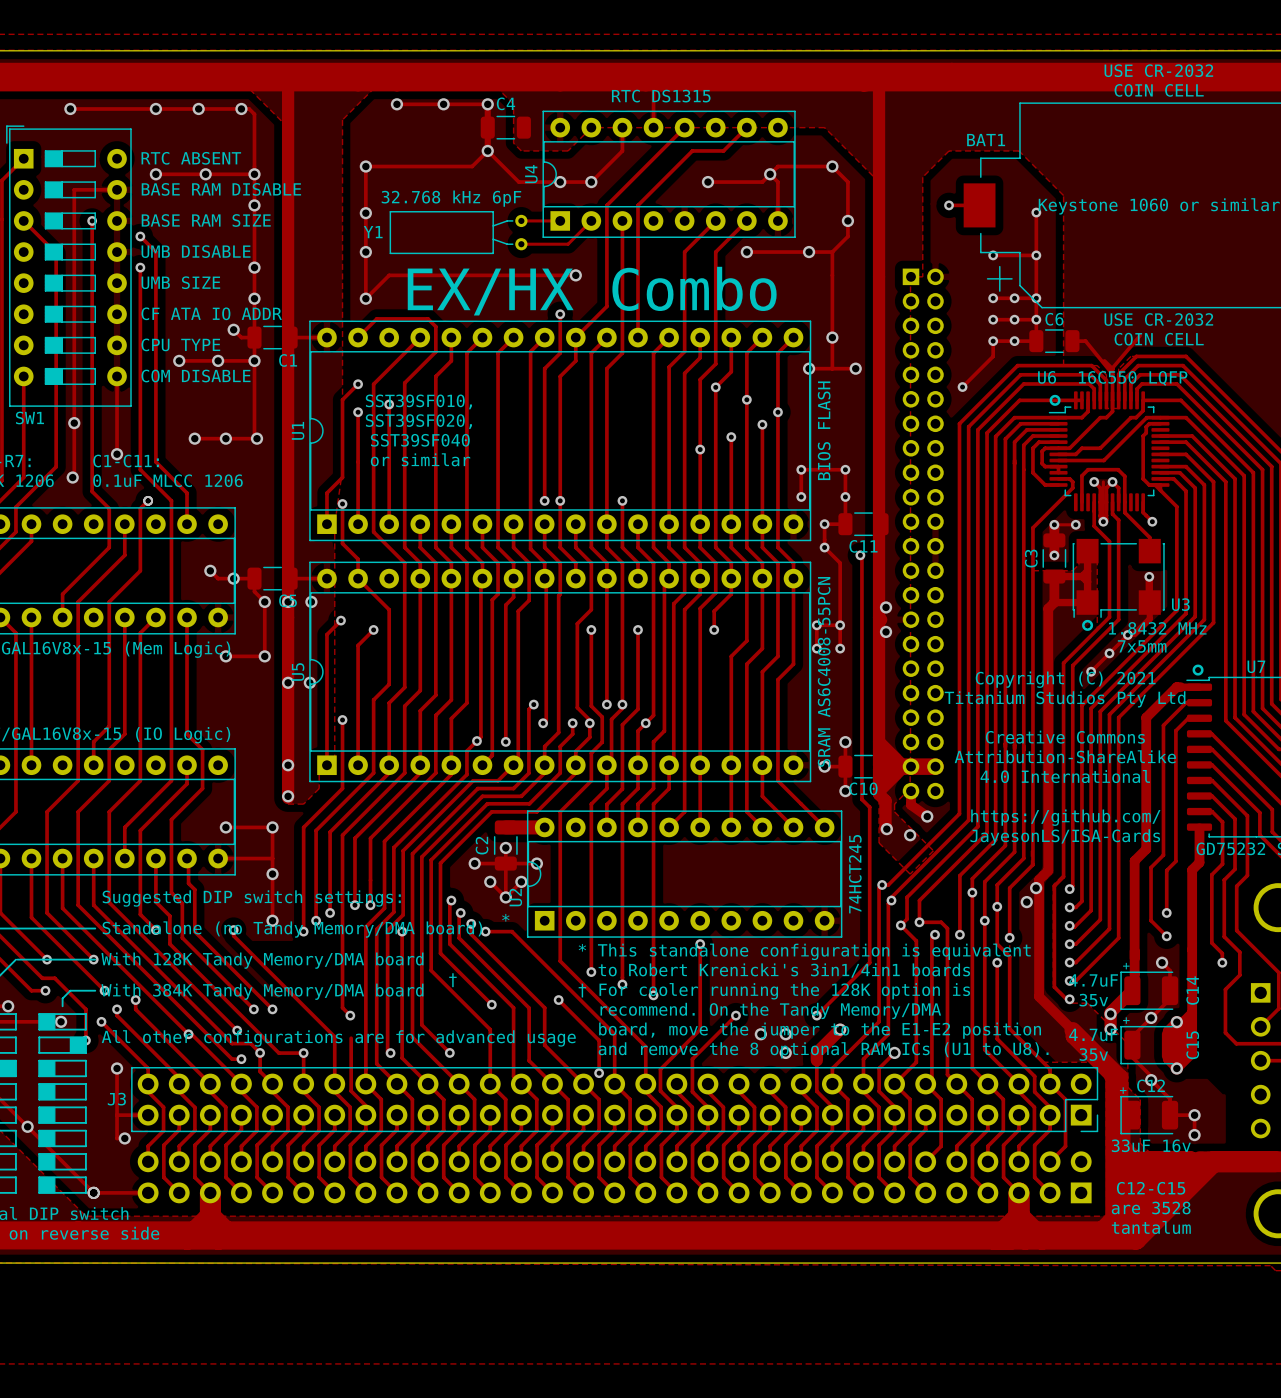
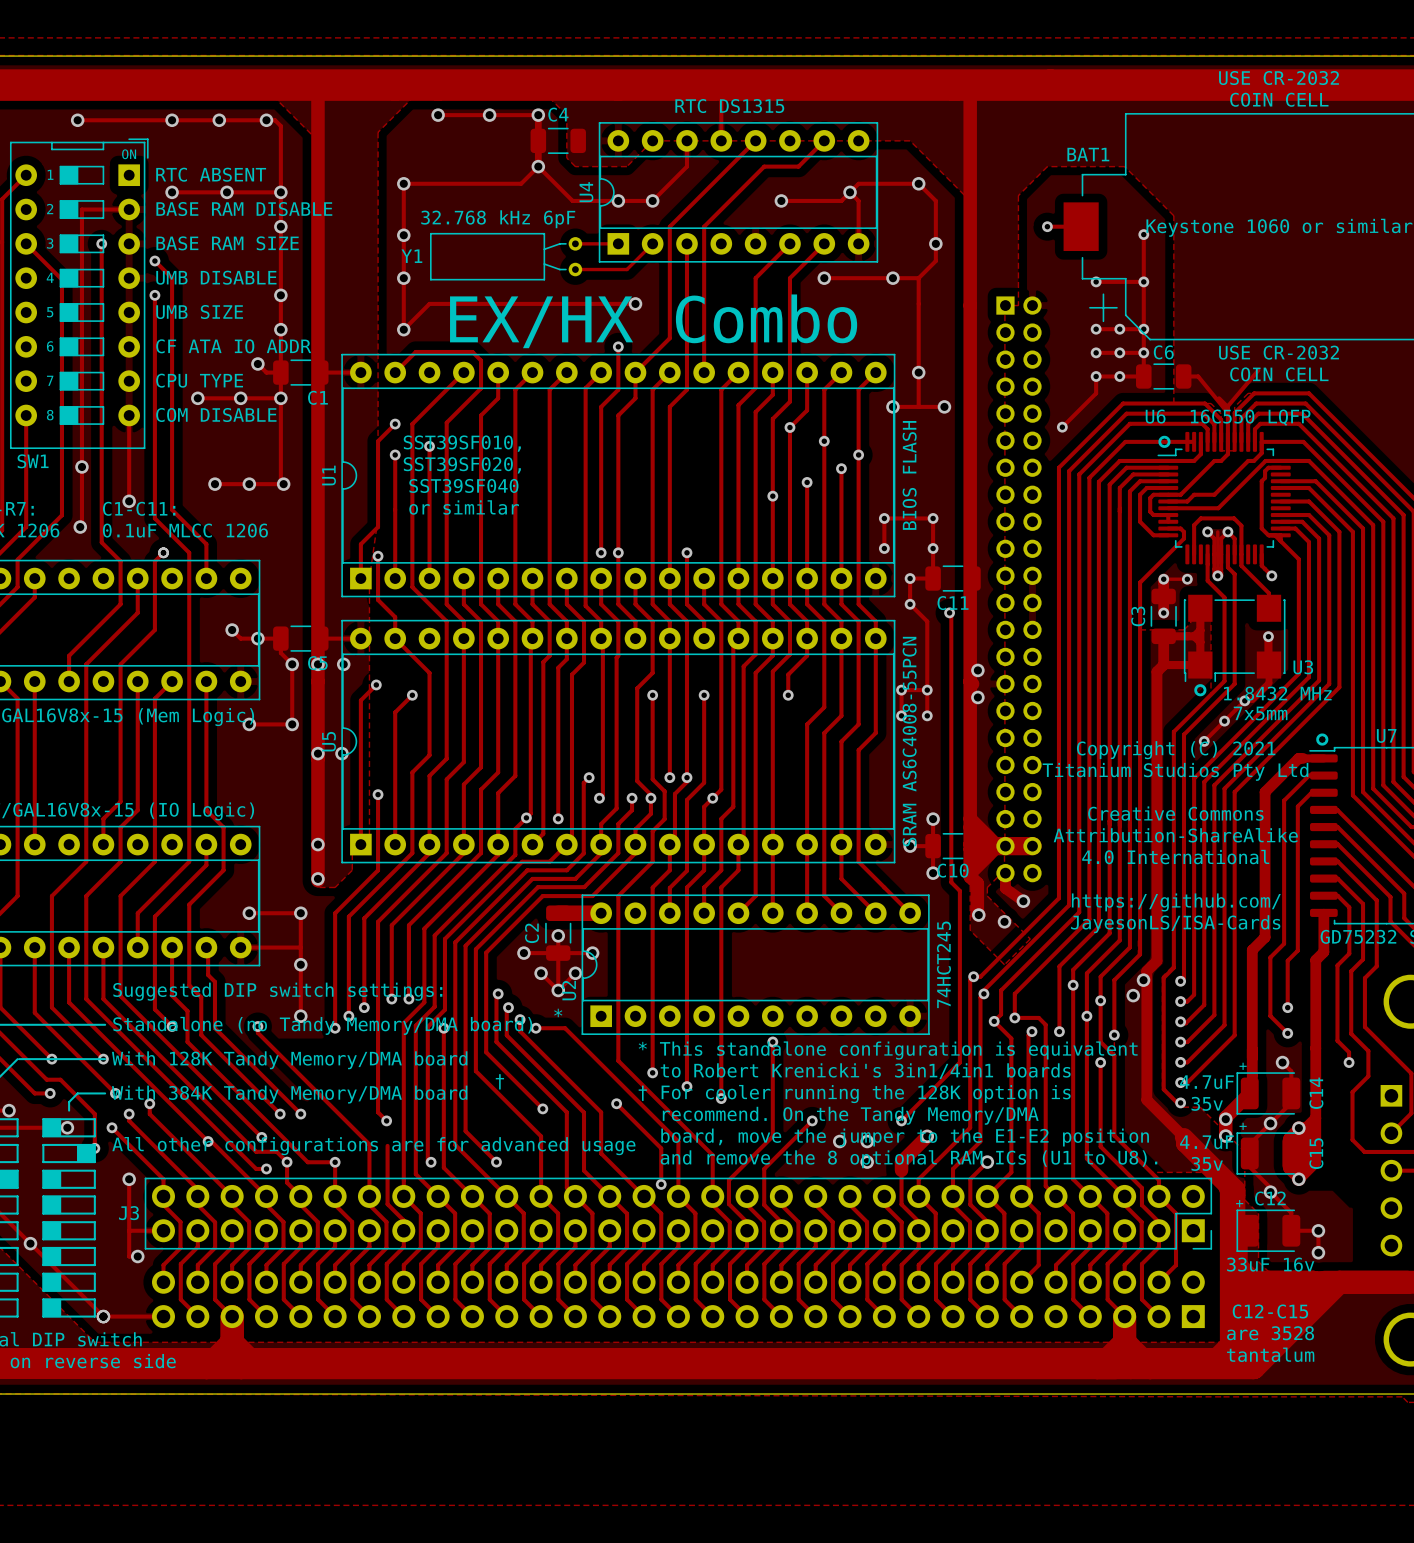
SW1 footprint: [6, 125, 132, 407] -> [9, 138, 149, 450]

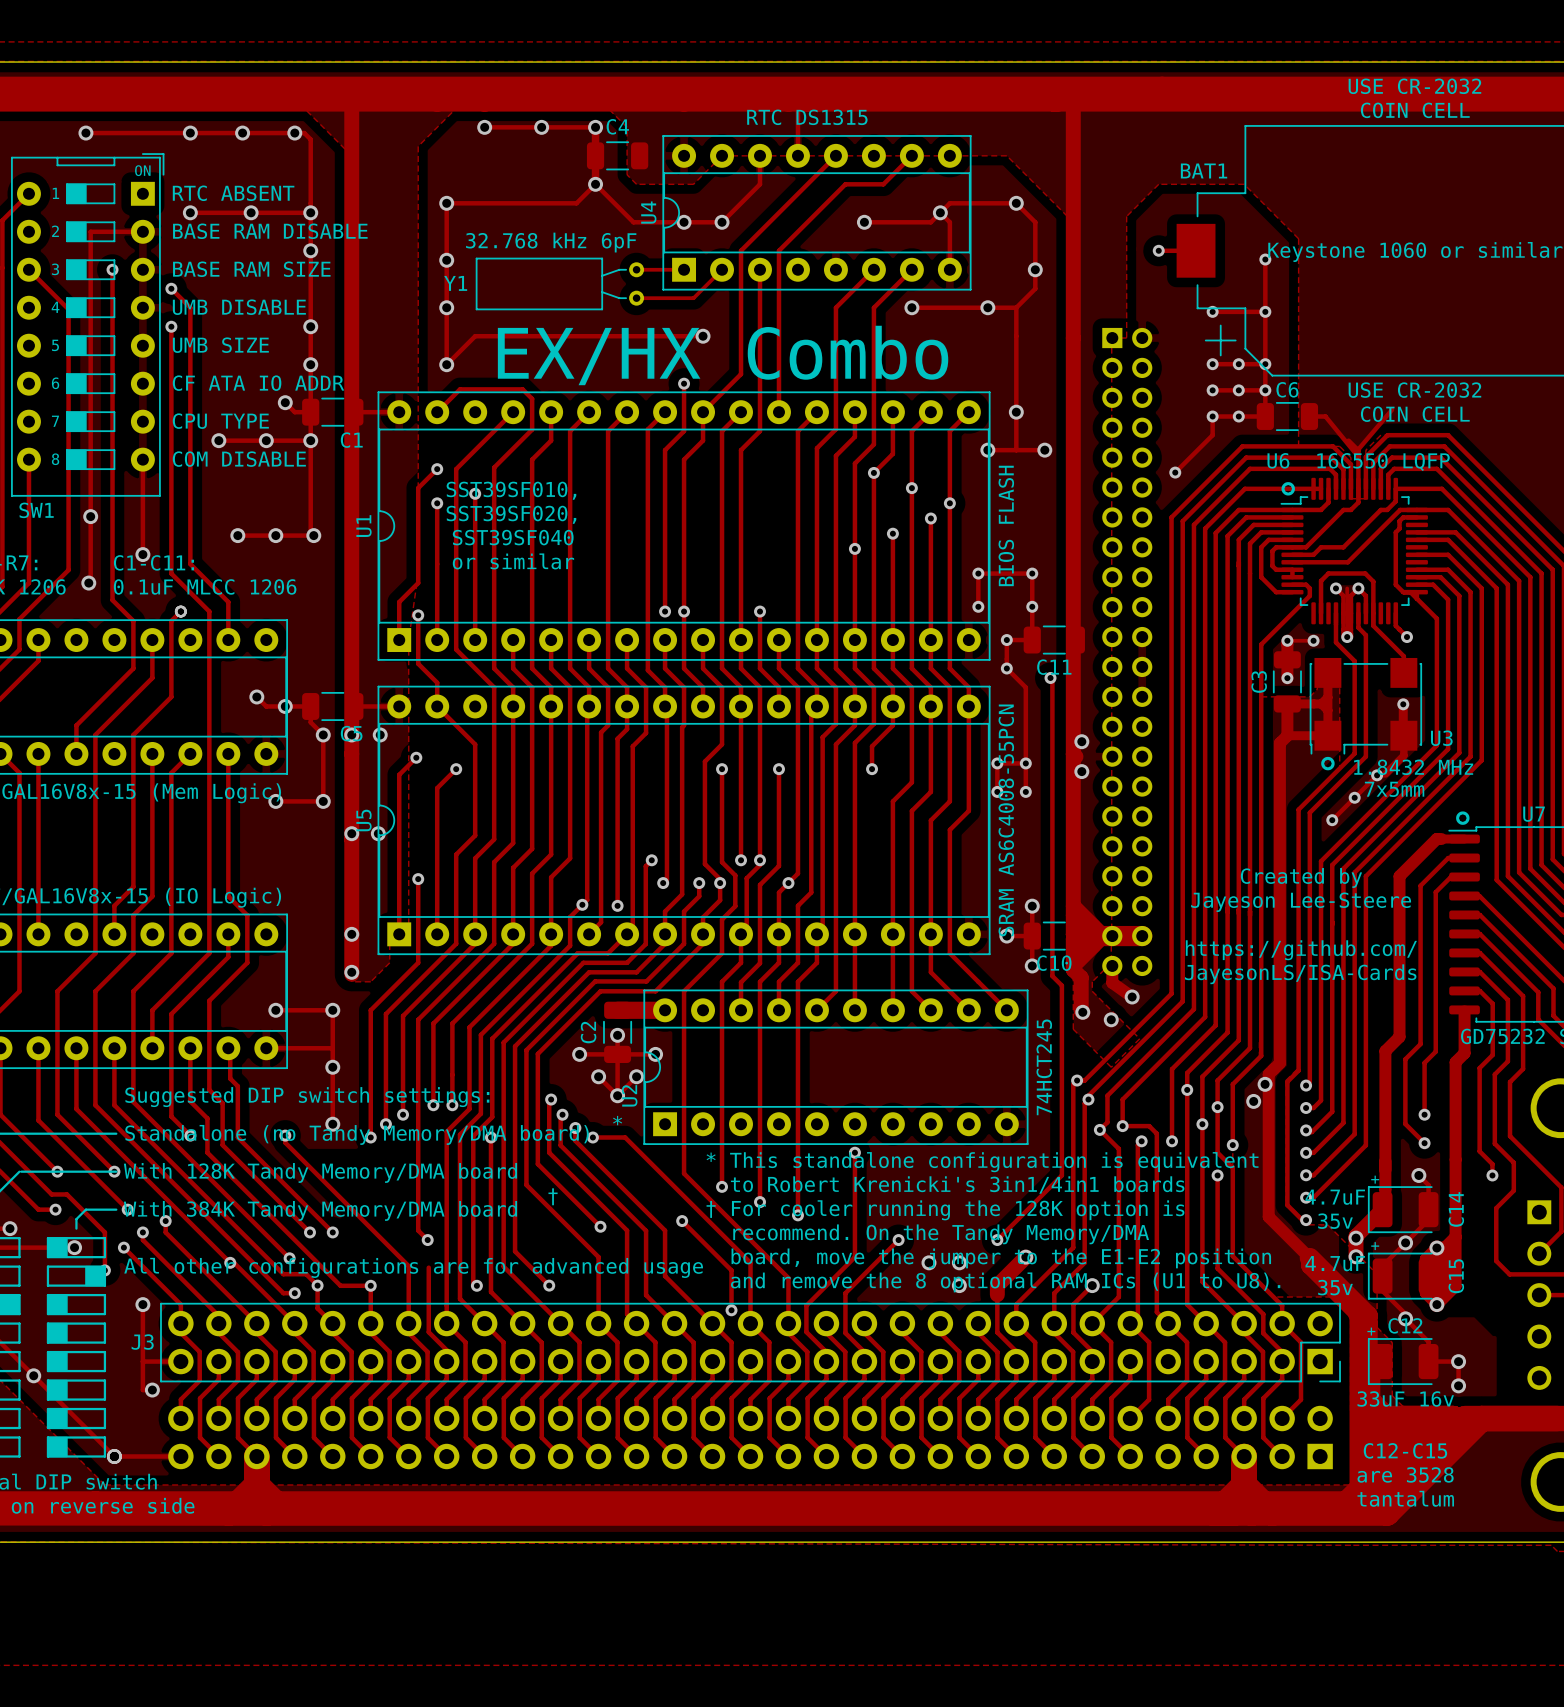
text: Copyright (C) 2021 (1176, 750) -> none
text: Titanium Studios Pty Ltd (1175, 771) -> none
text: none -> Created by (1301, 877)
text: Creative Commons (1175, 813) -> Jayeson Lee-Steere (1301, 902)
text: Attribution-ShareAlike (1175, 835) -> none
text: 4.0 International (1175, 857) -> https://github.com/ (1301, 950)
text: https://github.com/ (1176, 902) -> none
text position: JayesonLS/ISA-Cards (1175, 924) -> JayesonLS/ISA-Cards (1300, 974)

